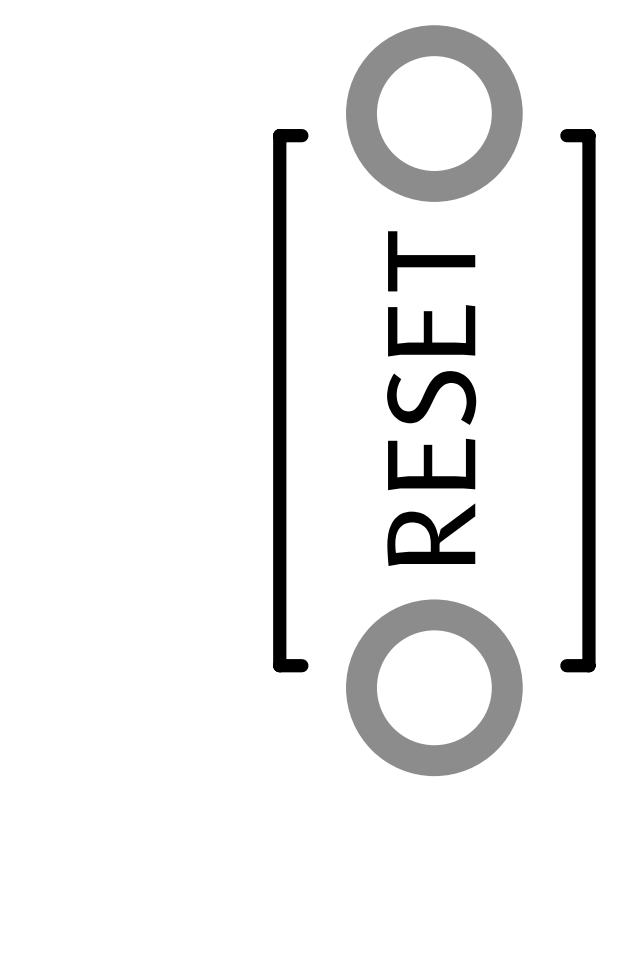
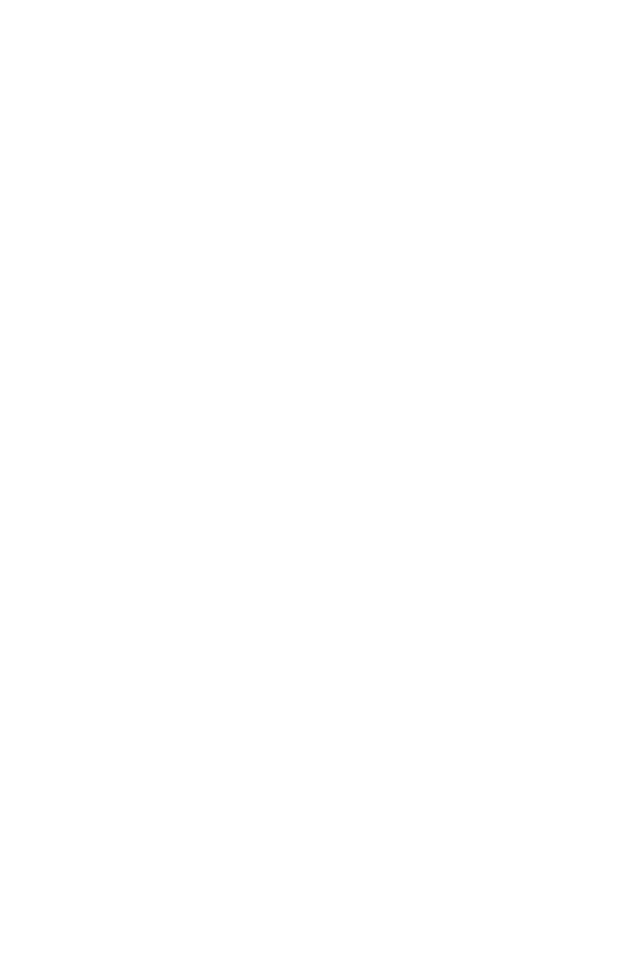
part: (434, 400) -> none

